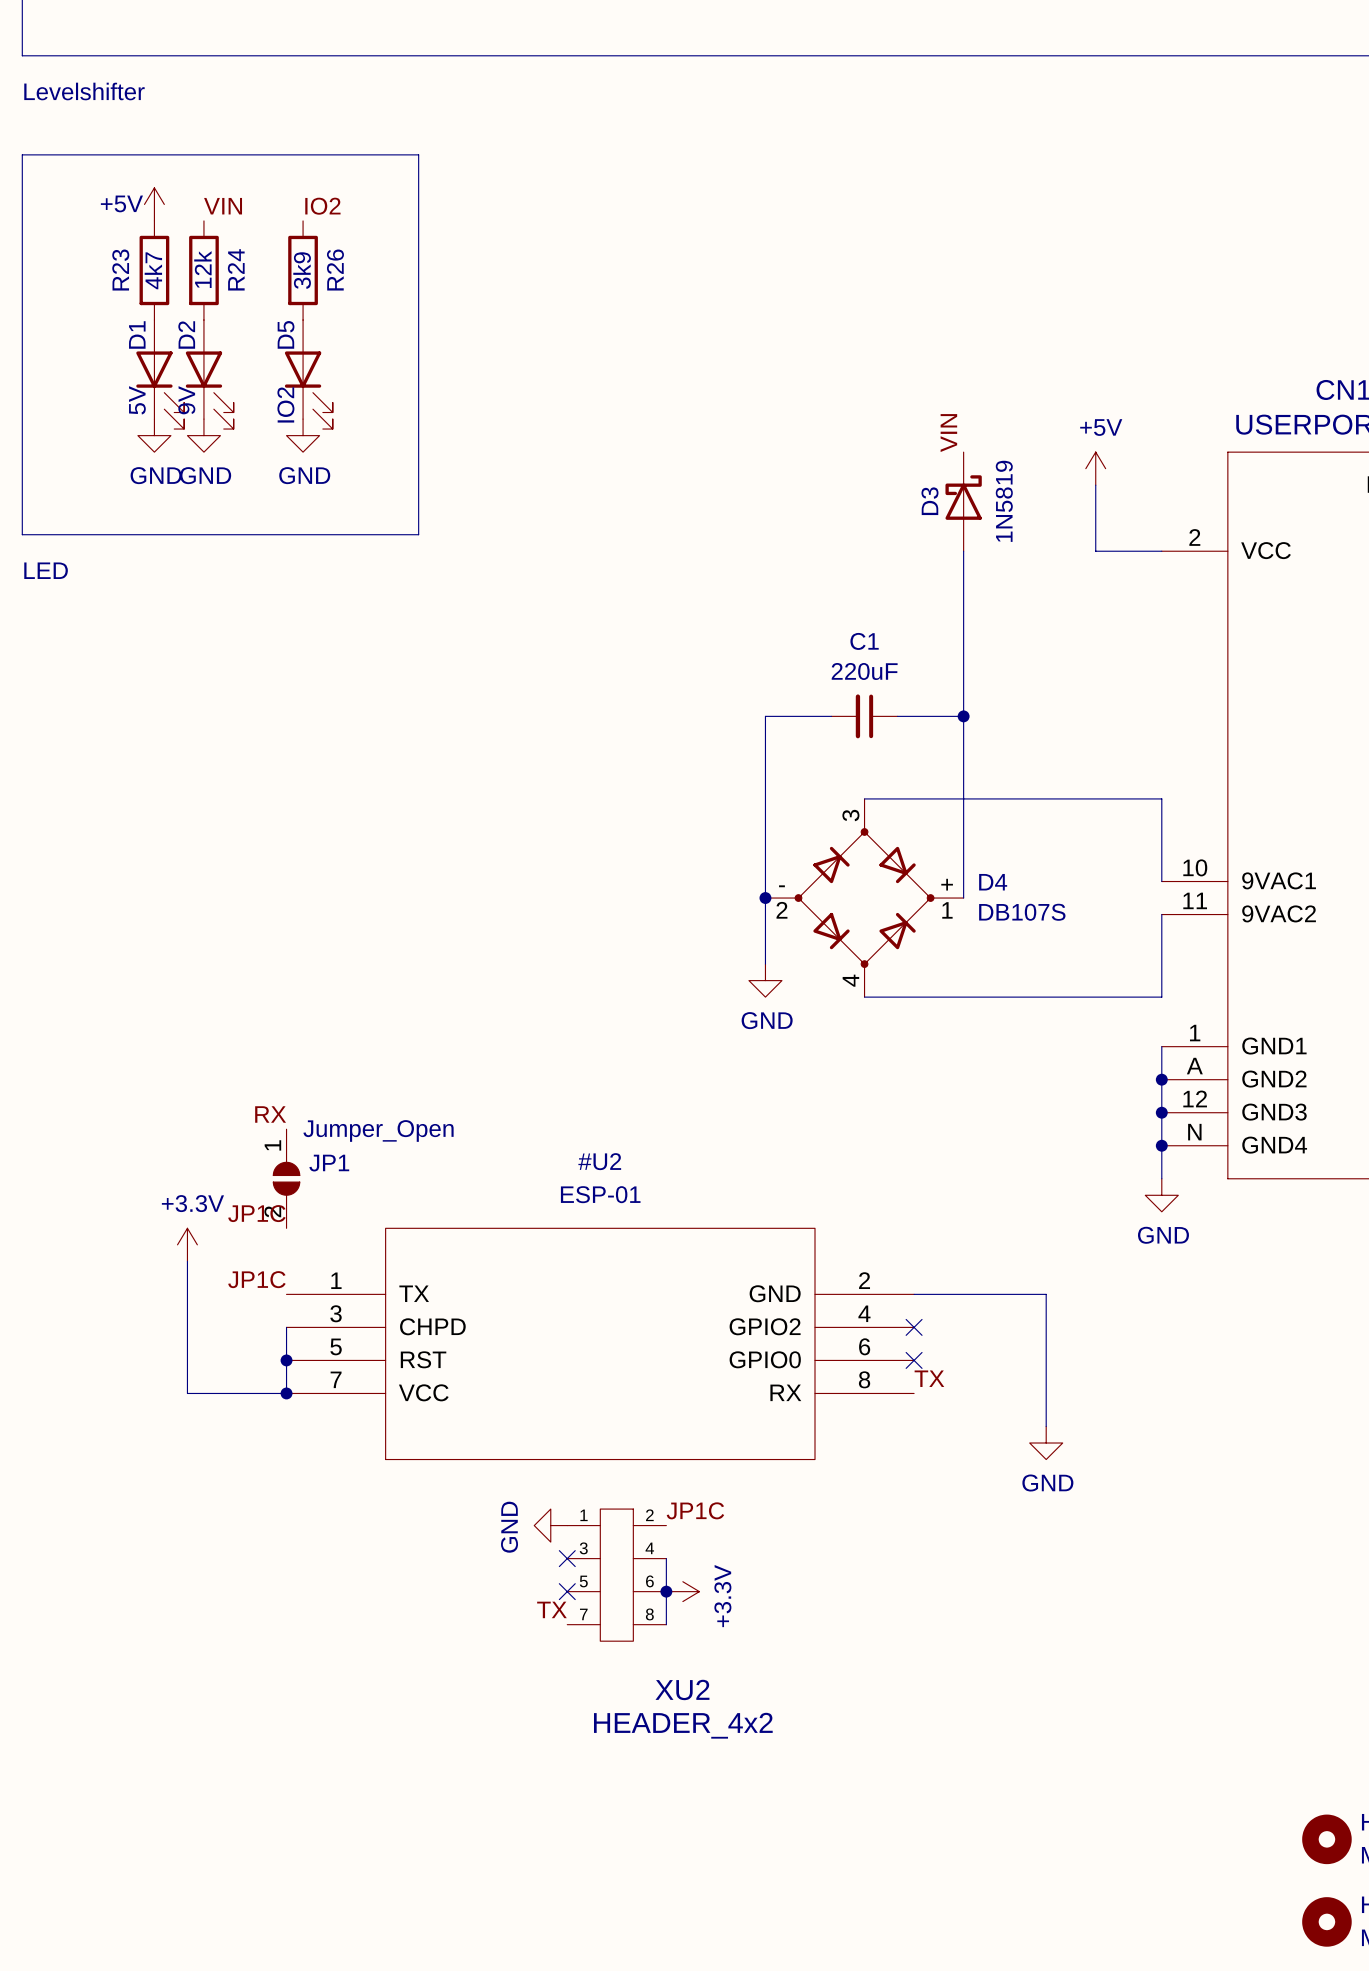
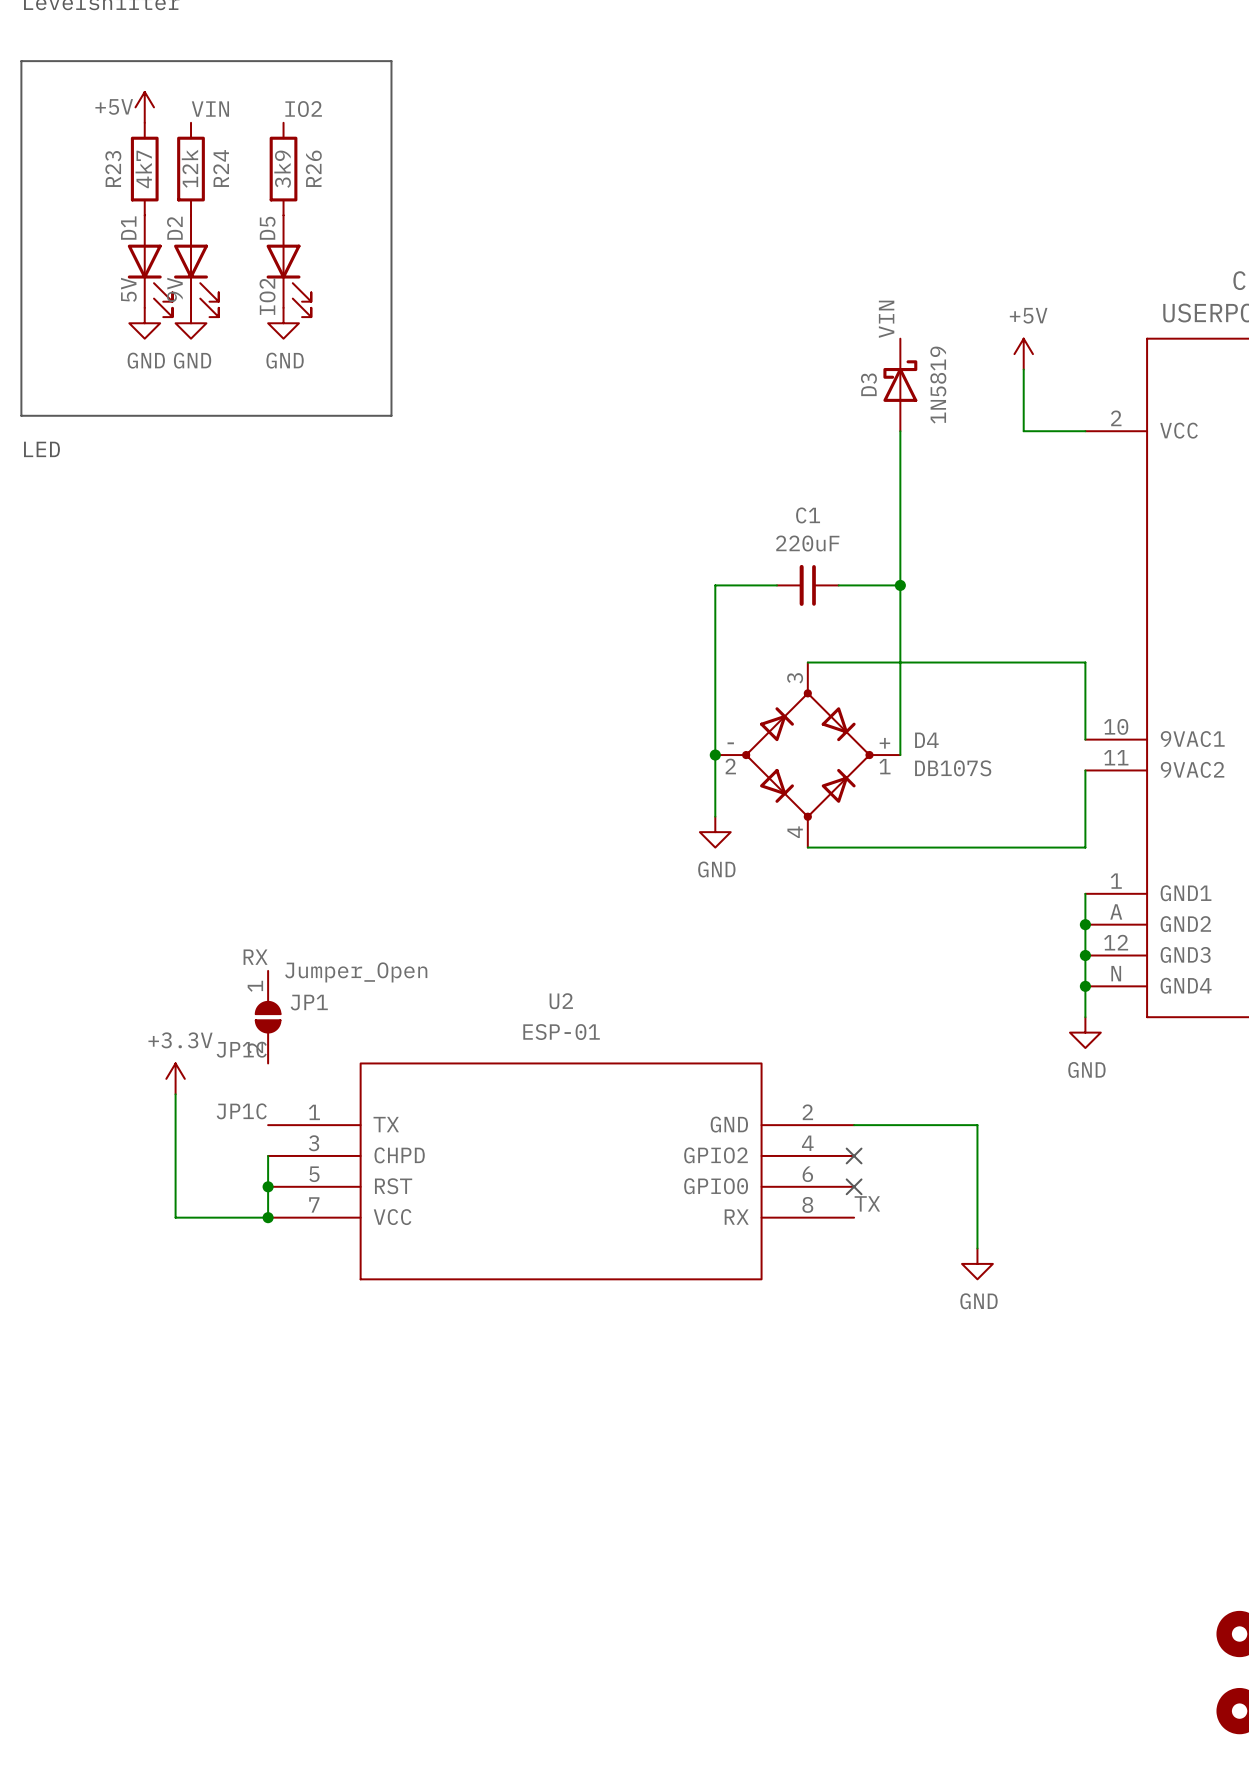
U2: none -> ESP-01 (561, 1171)
#U2: ESP-01 (600, 1343) -> none
label: JP1C (695, 1510) -> none
power symbol: GND (550, 1525) -> none
no-connect mark: (567, 1558) -> none
wire: (666, 1558) (666, 1624) -> none
XU2: HEADER_4x2 (616, 1575) -> none
no-connect mark: (567, 1591) -> none
junction: (666, 1591) -> none
power symbol: +3.3V (682, 1591) -> none
label: TX (551, 1609) -> none

